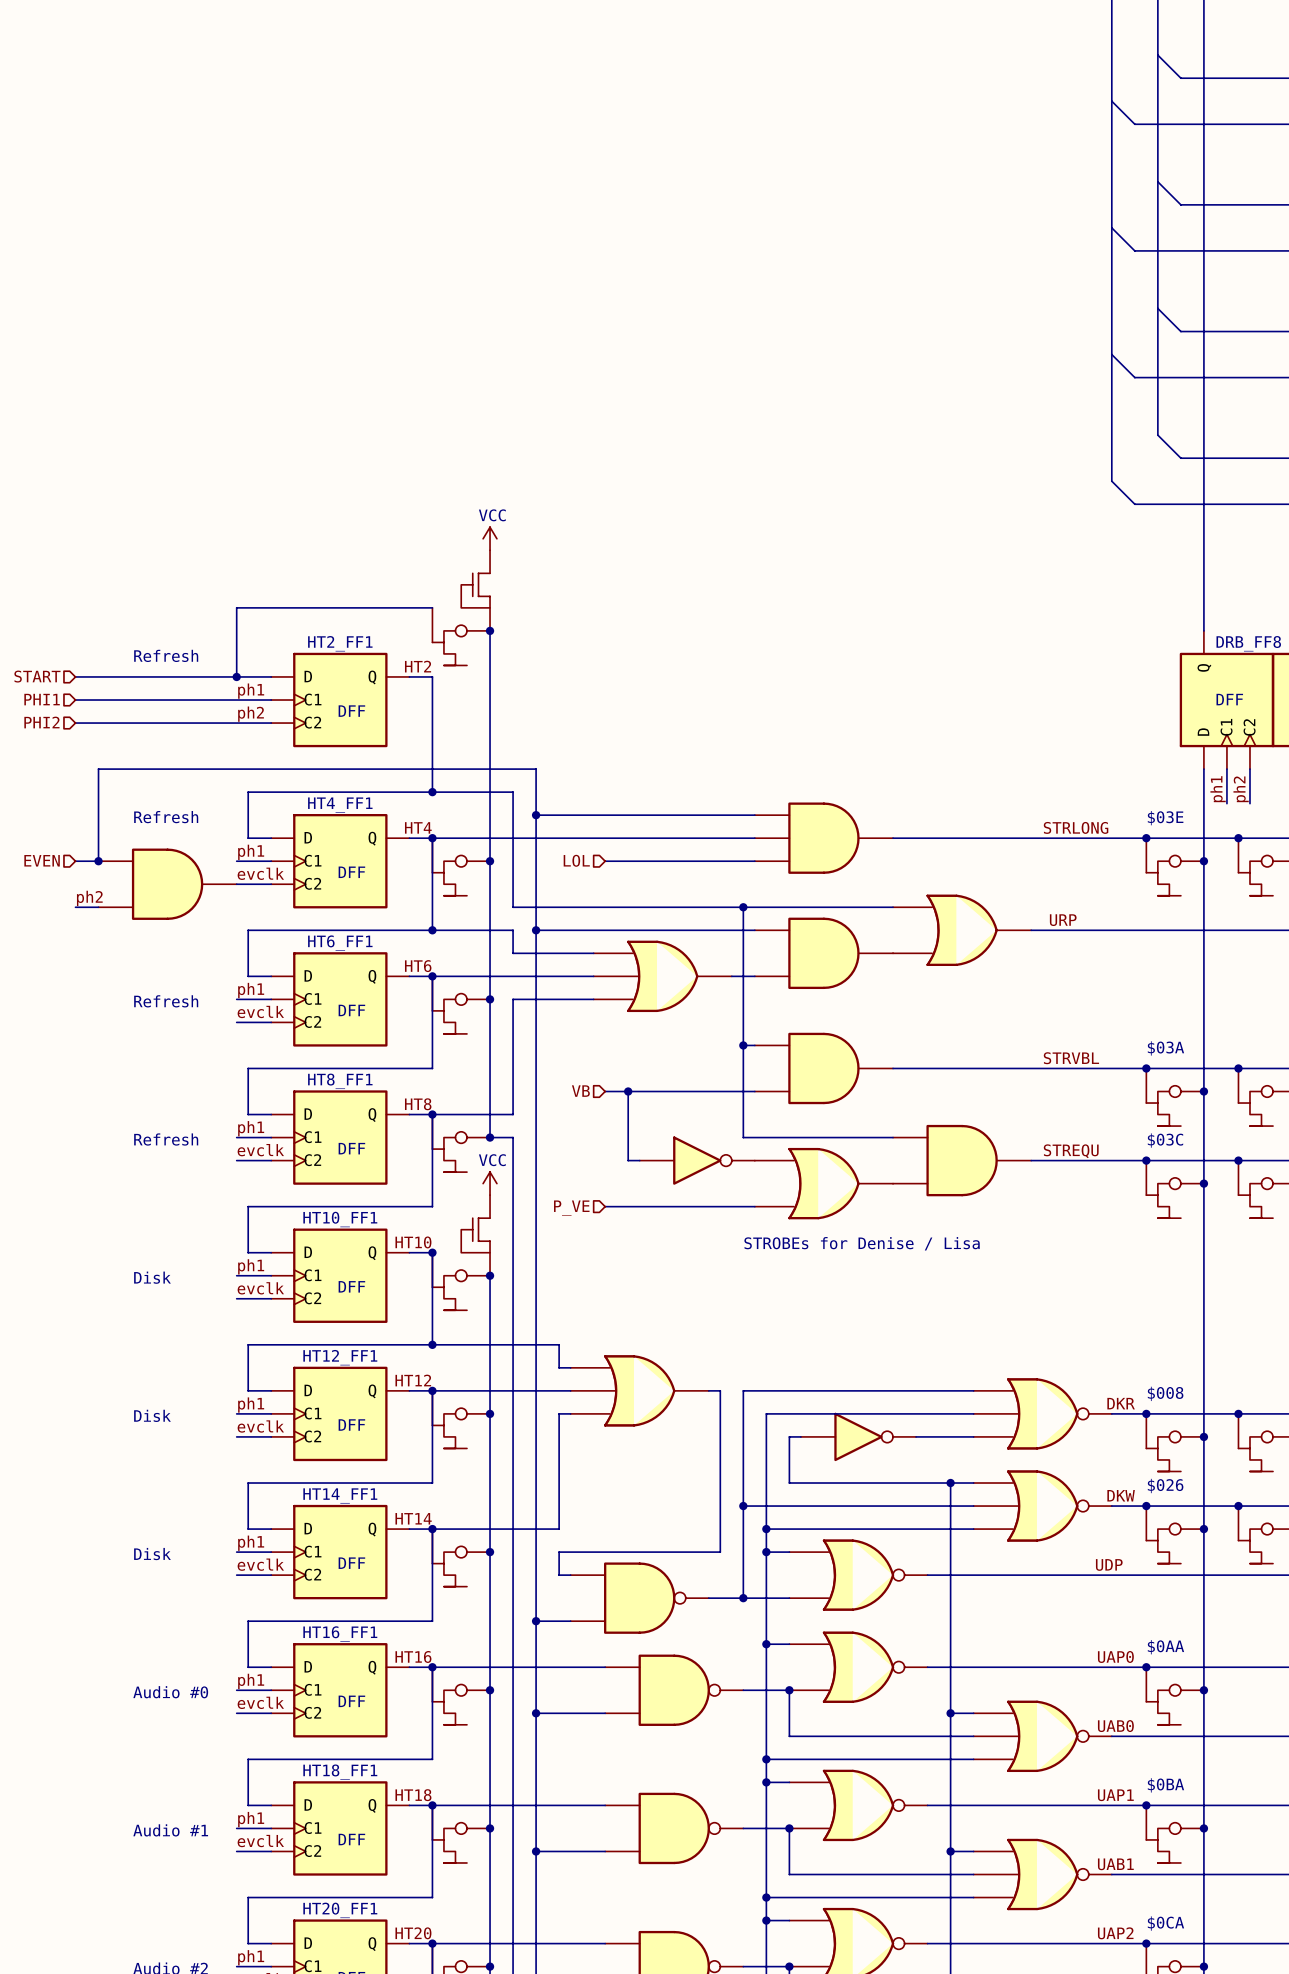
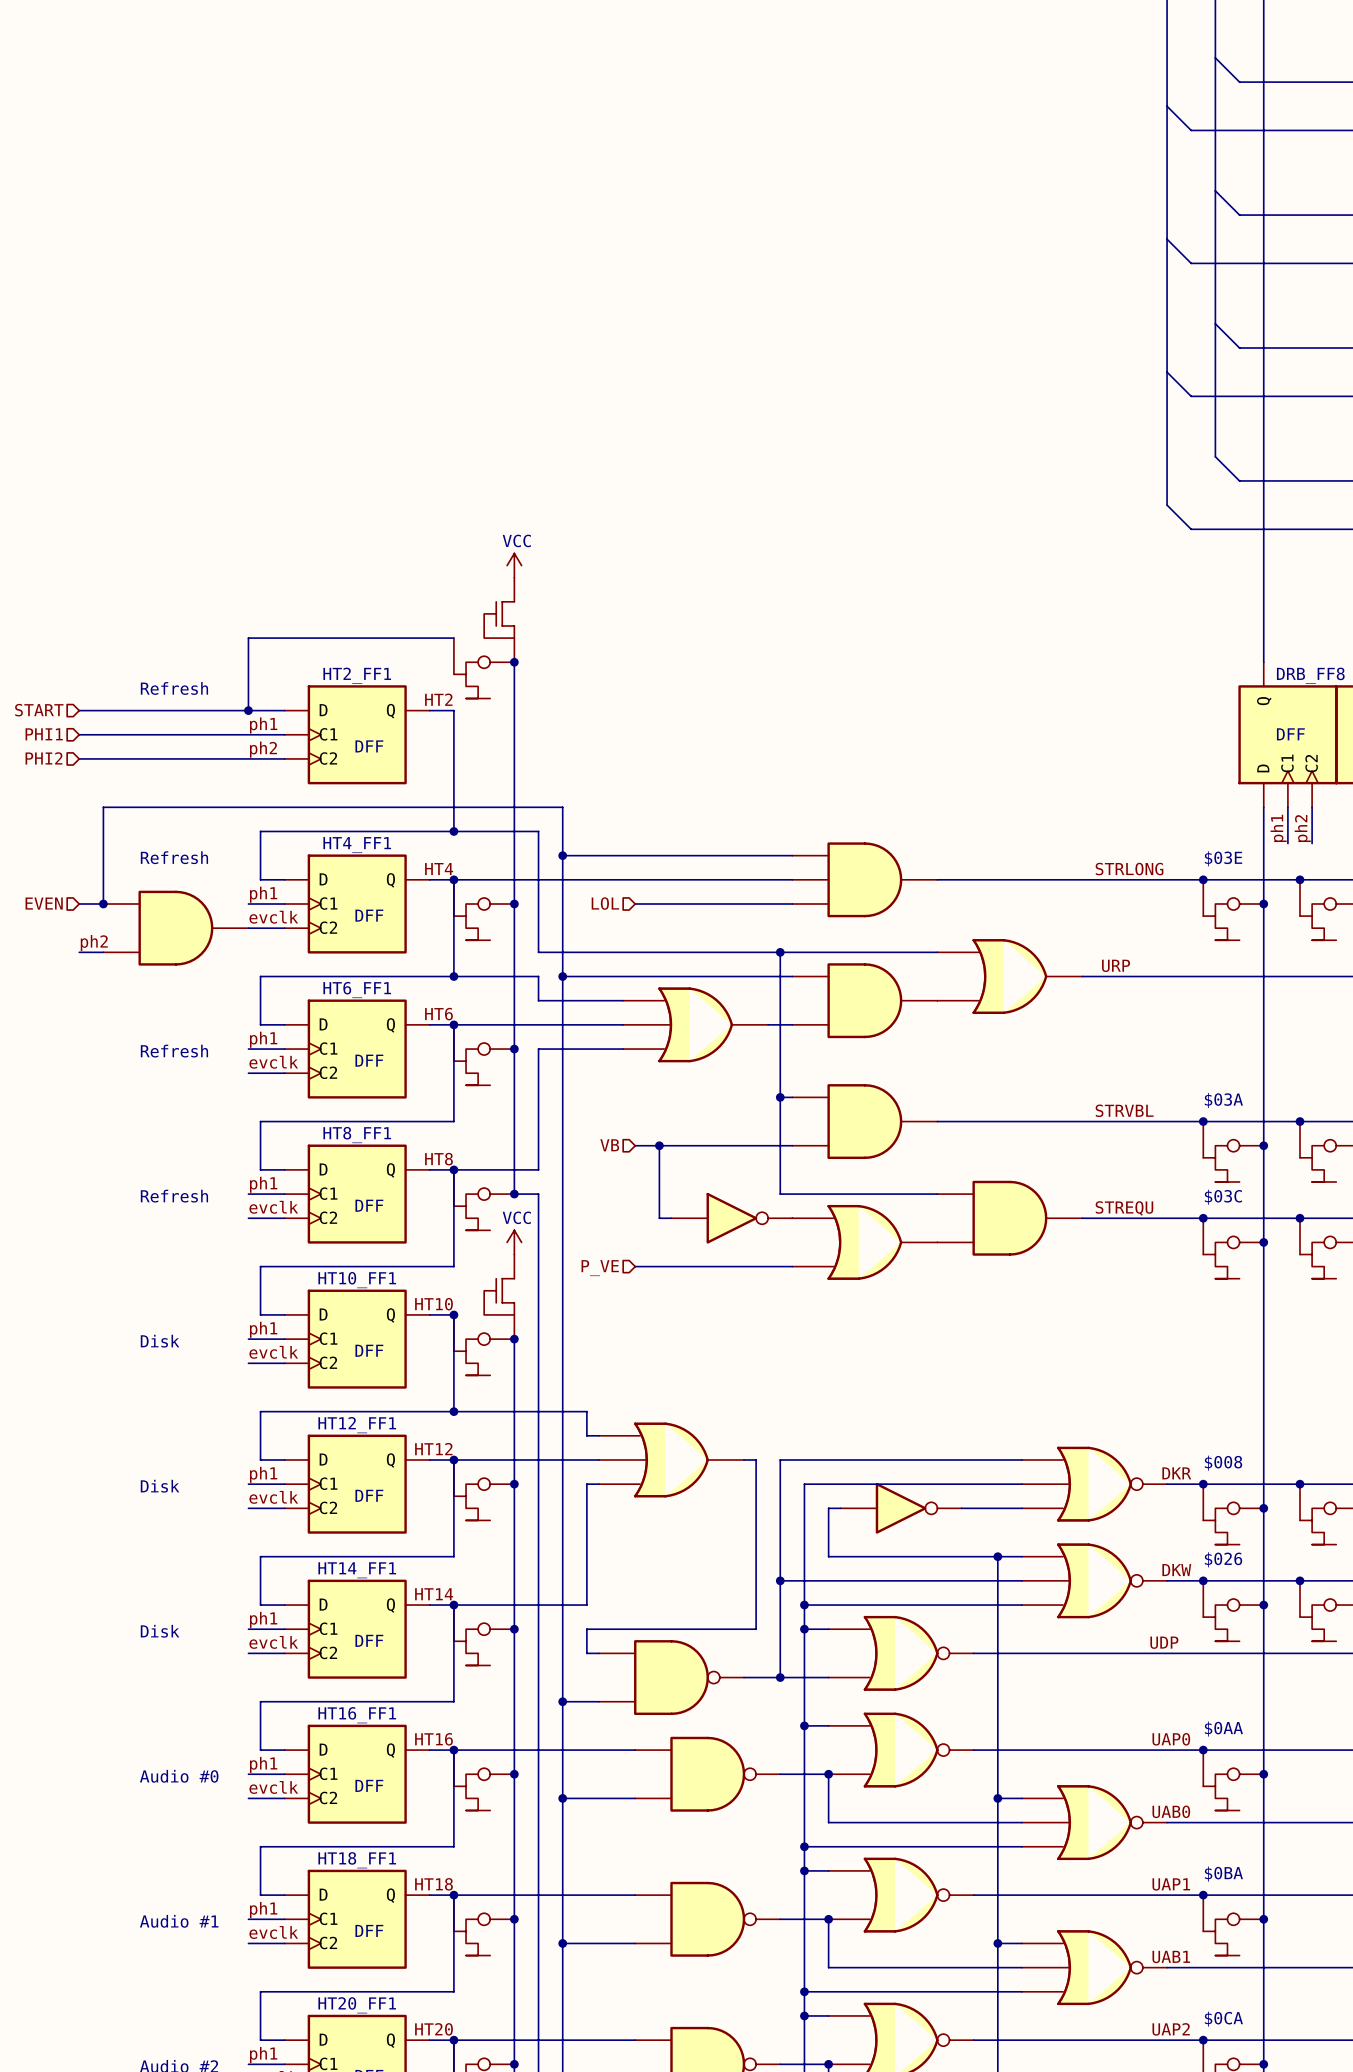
text: STROBEs for Denise / Lisa (862, 1243) -> none

